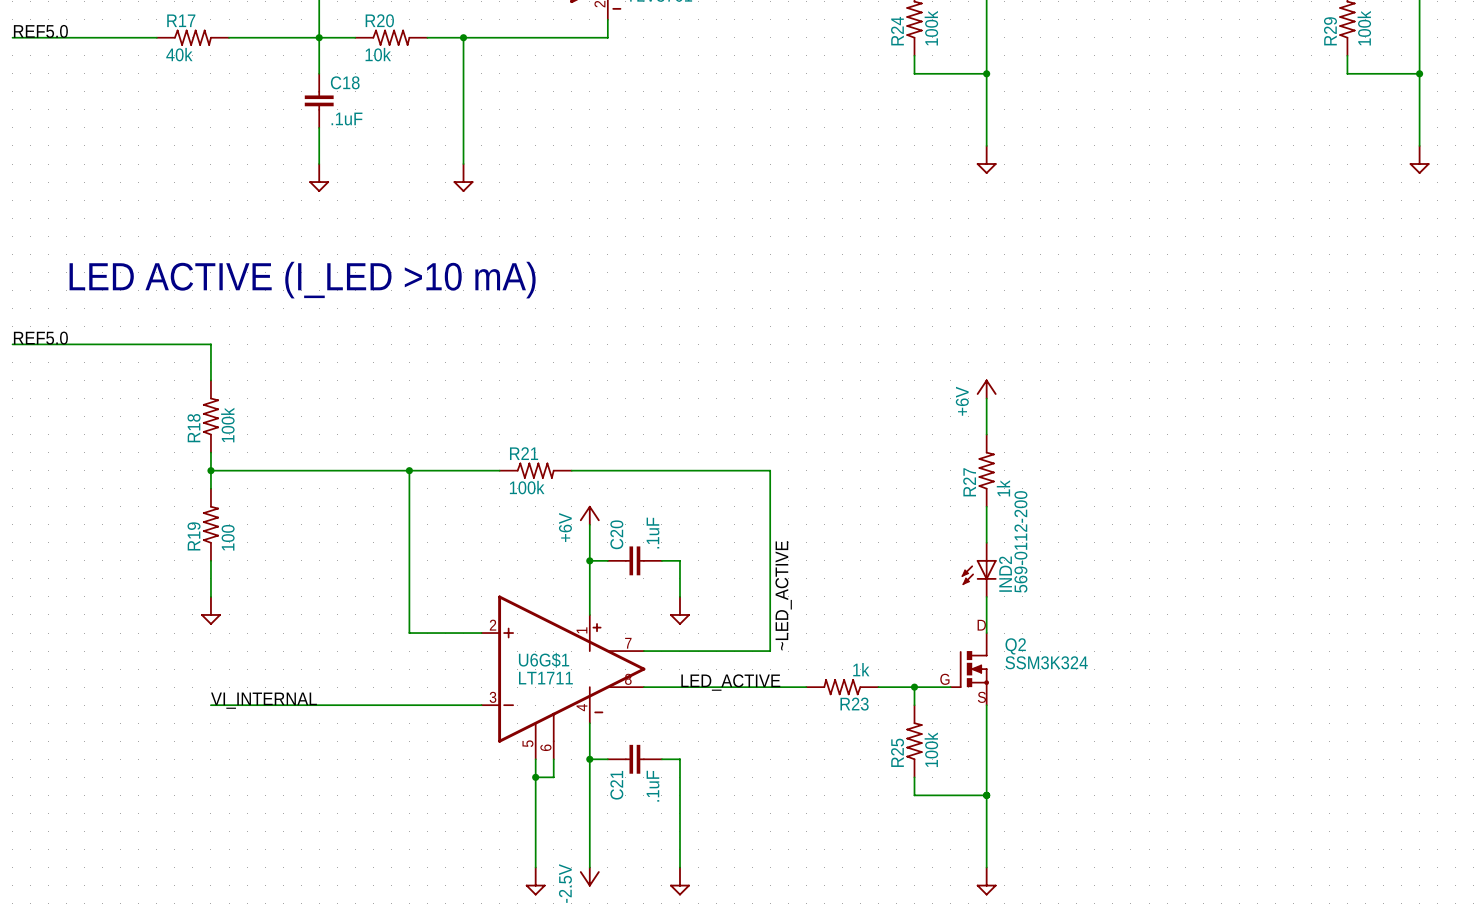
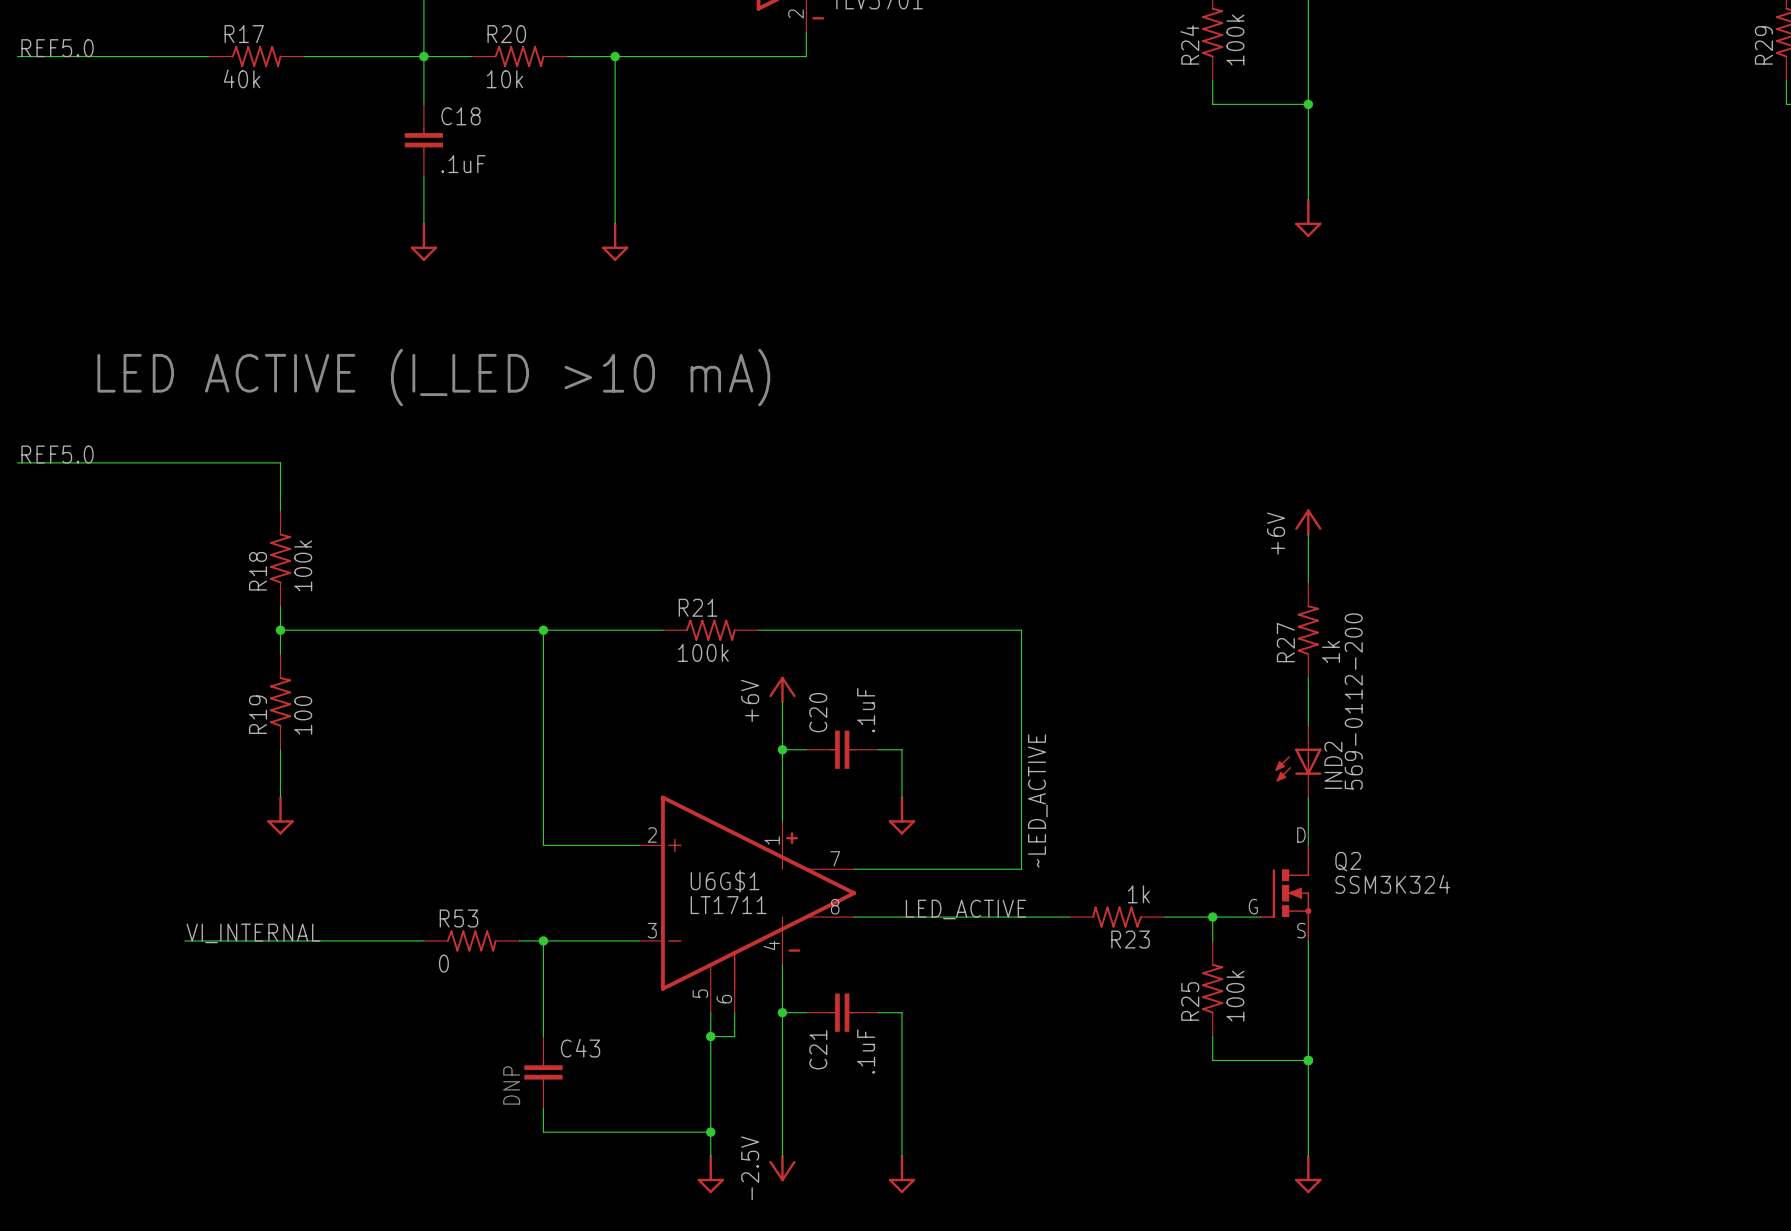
label position: VI_INTERNAL (263, 700) -> VI_INTERNAL (253, 933)
wire: none -> (184, 940) (280, 940)
R53: none -> 0 (471, 940)
wire: none -> (543, 940) (543, 1036)
junction: none -> (543, 940)
C43: none -> (543, 1072)
text: none -> DNP (511, 1085)
wire: none -> (543, 1108) (543, 1132) (710, 1132)
junction: none -> (710, 1132)

